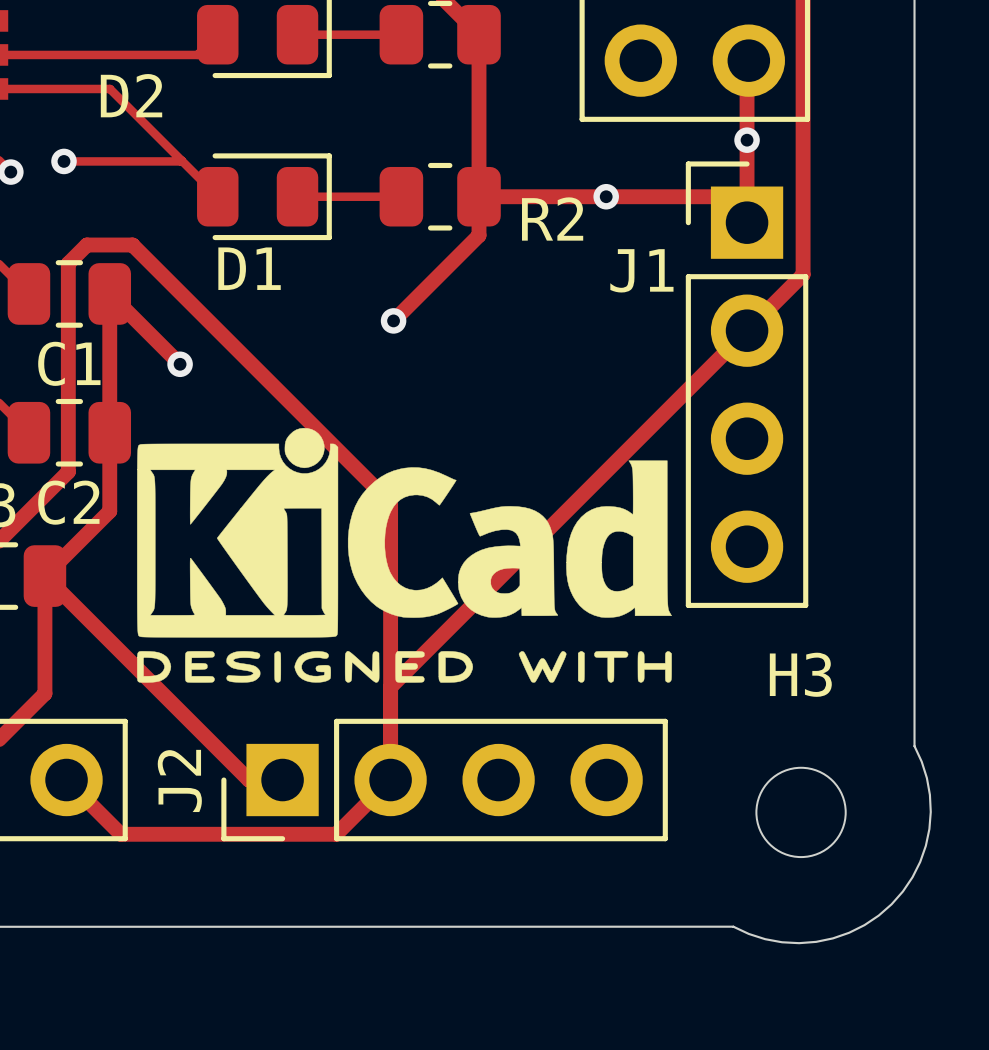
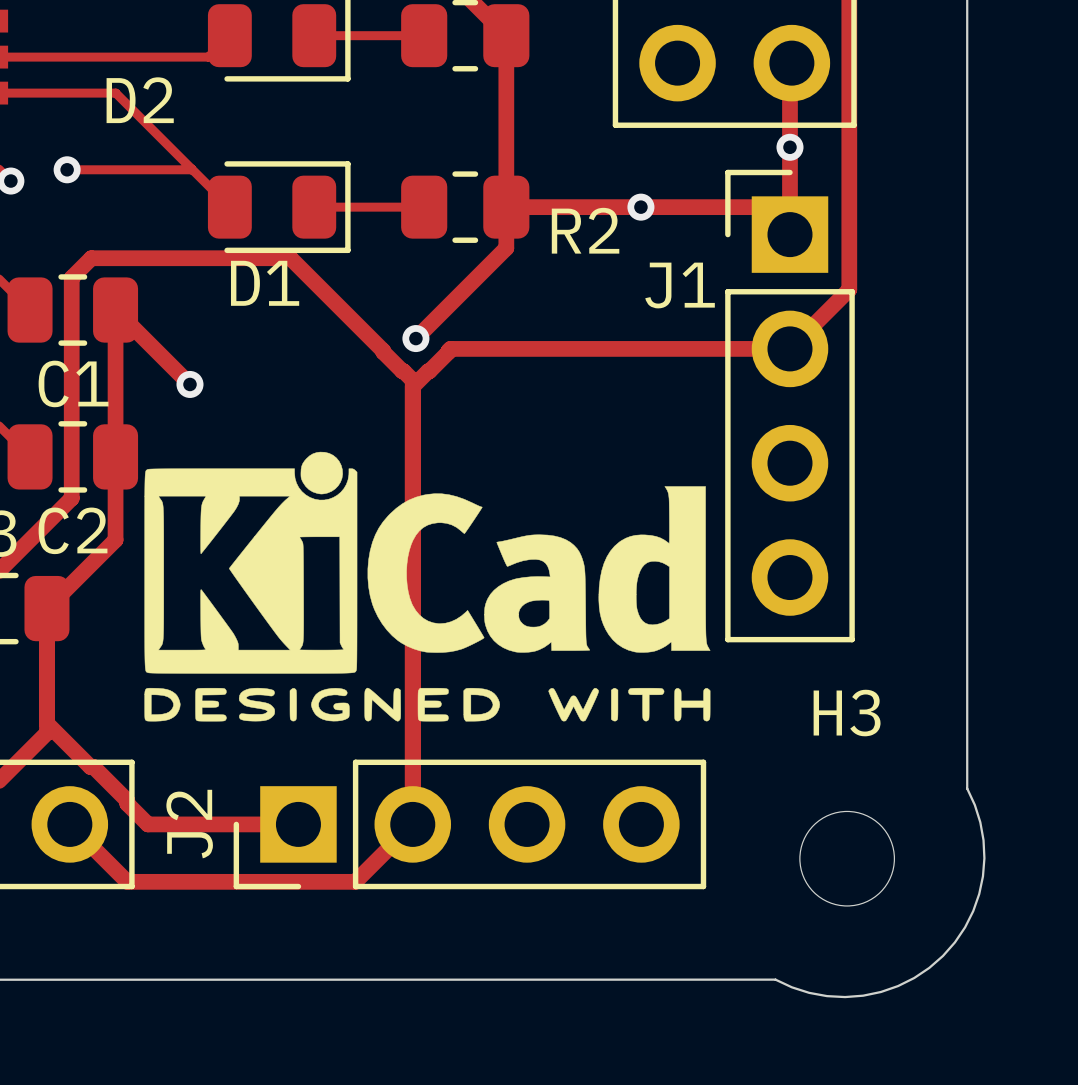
track: (132, 245) (390, 503) -> (139, 258) (290, 258) (412, 380) (412, 531)
track: (747, 330) (390, 687) -> (789, 348) (450, 348) (412, 386)
track: (44, 576) (248, 780) -> (46, 723) (90, 766) (93, 766) (147, 824) (262, 824)

